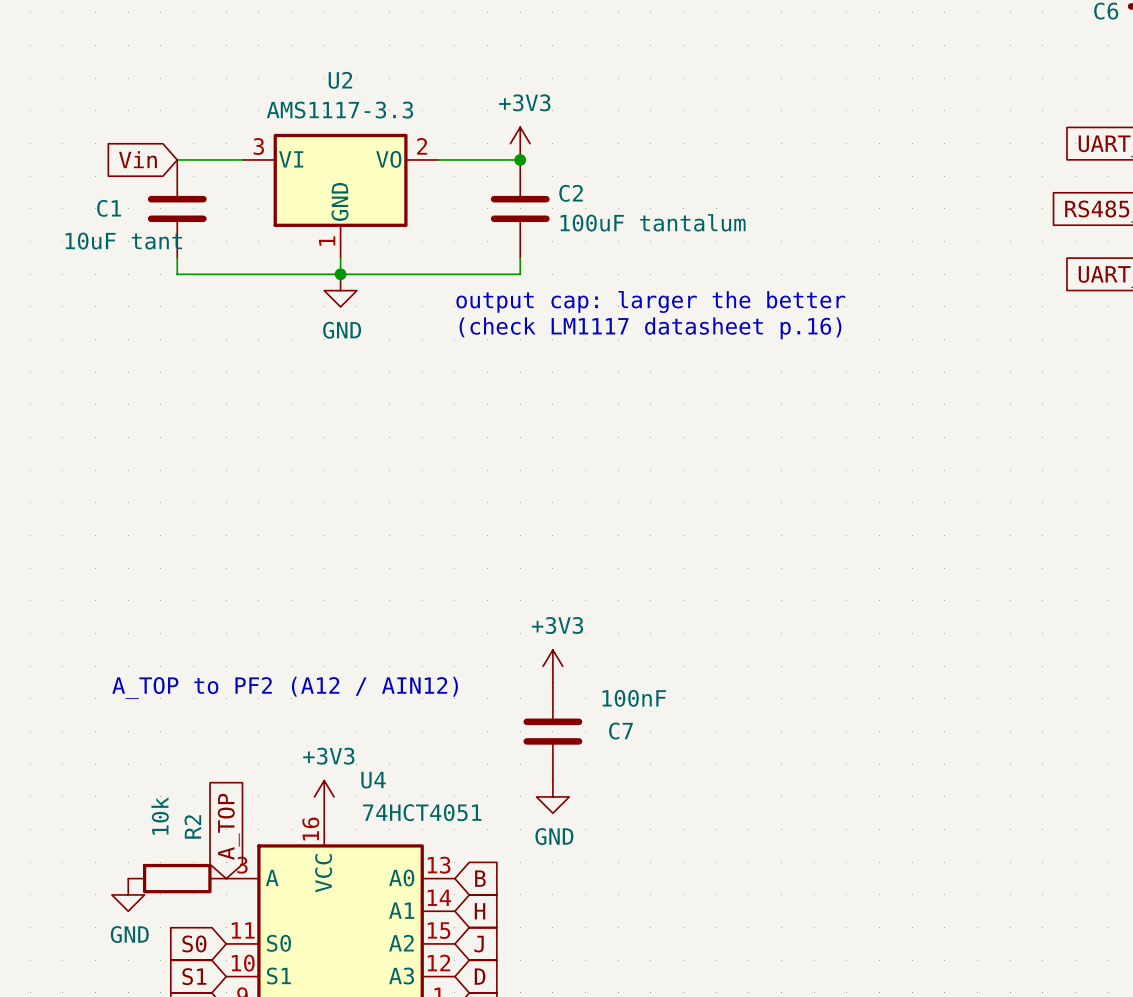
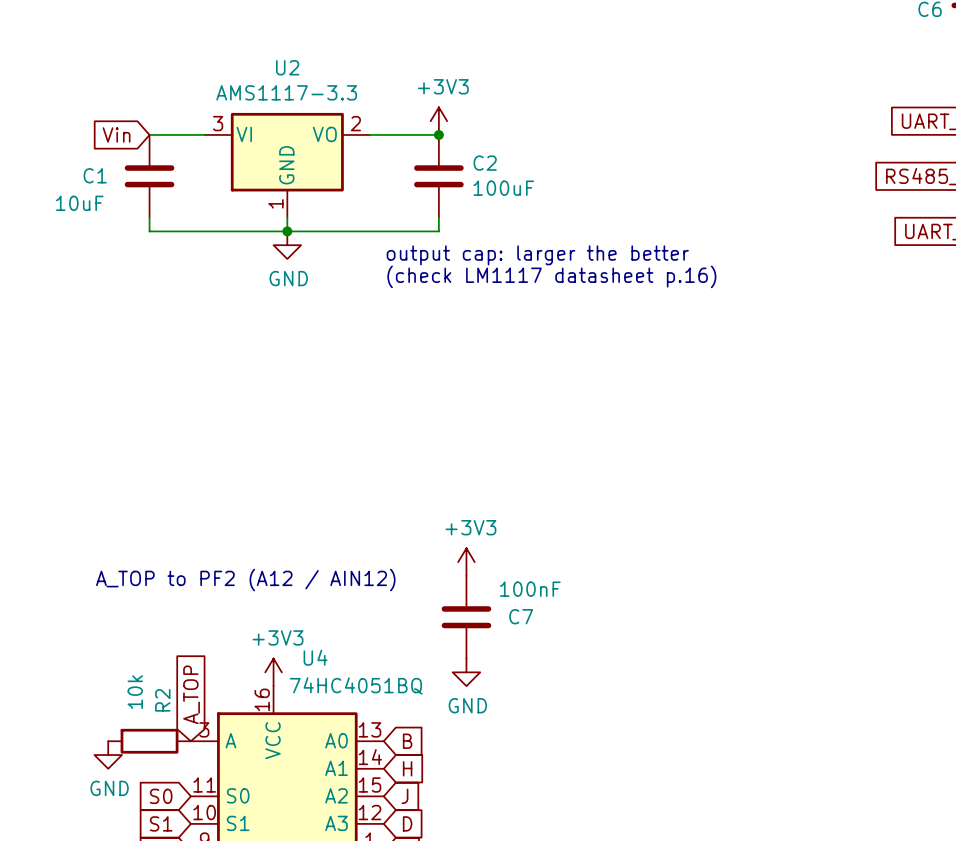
C2 value: 100uF tantalum (653, 222) -> 100uF (503, 188)
C1 value: 10uF tant (123, 241) -> 10uF (79, 203)
U4 value: 74HCT4051 (422, 812) -> 74HC4051BQ (356, 685)

